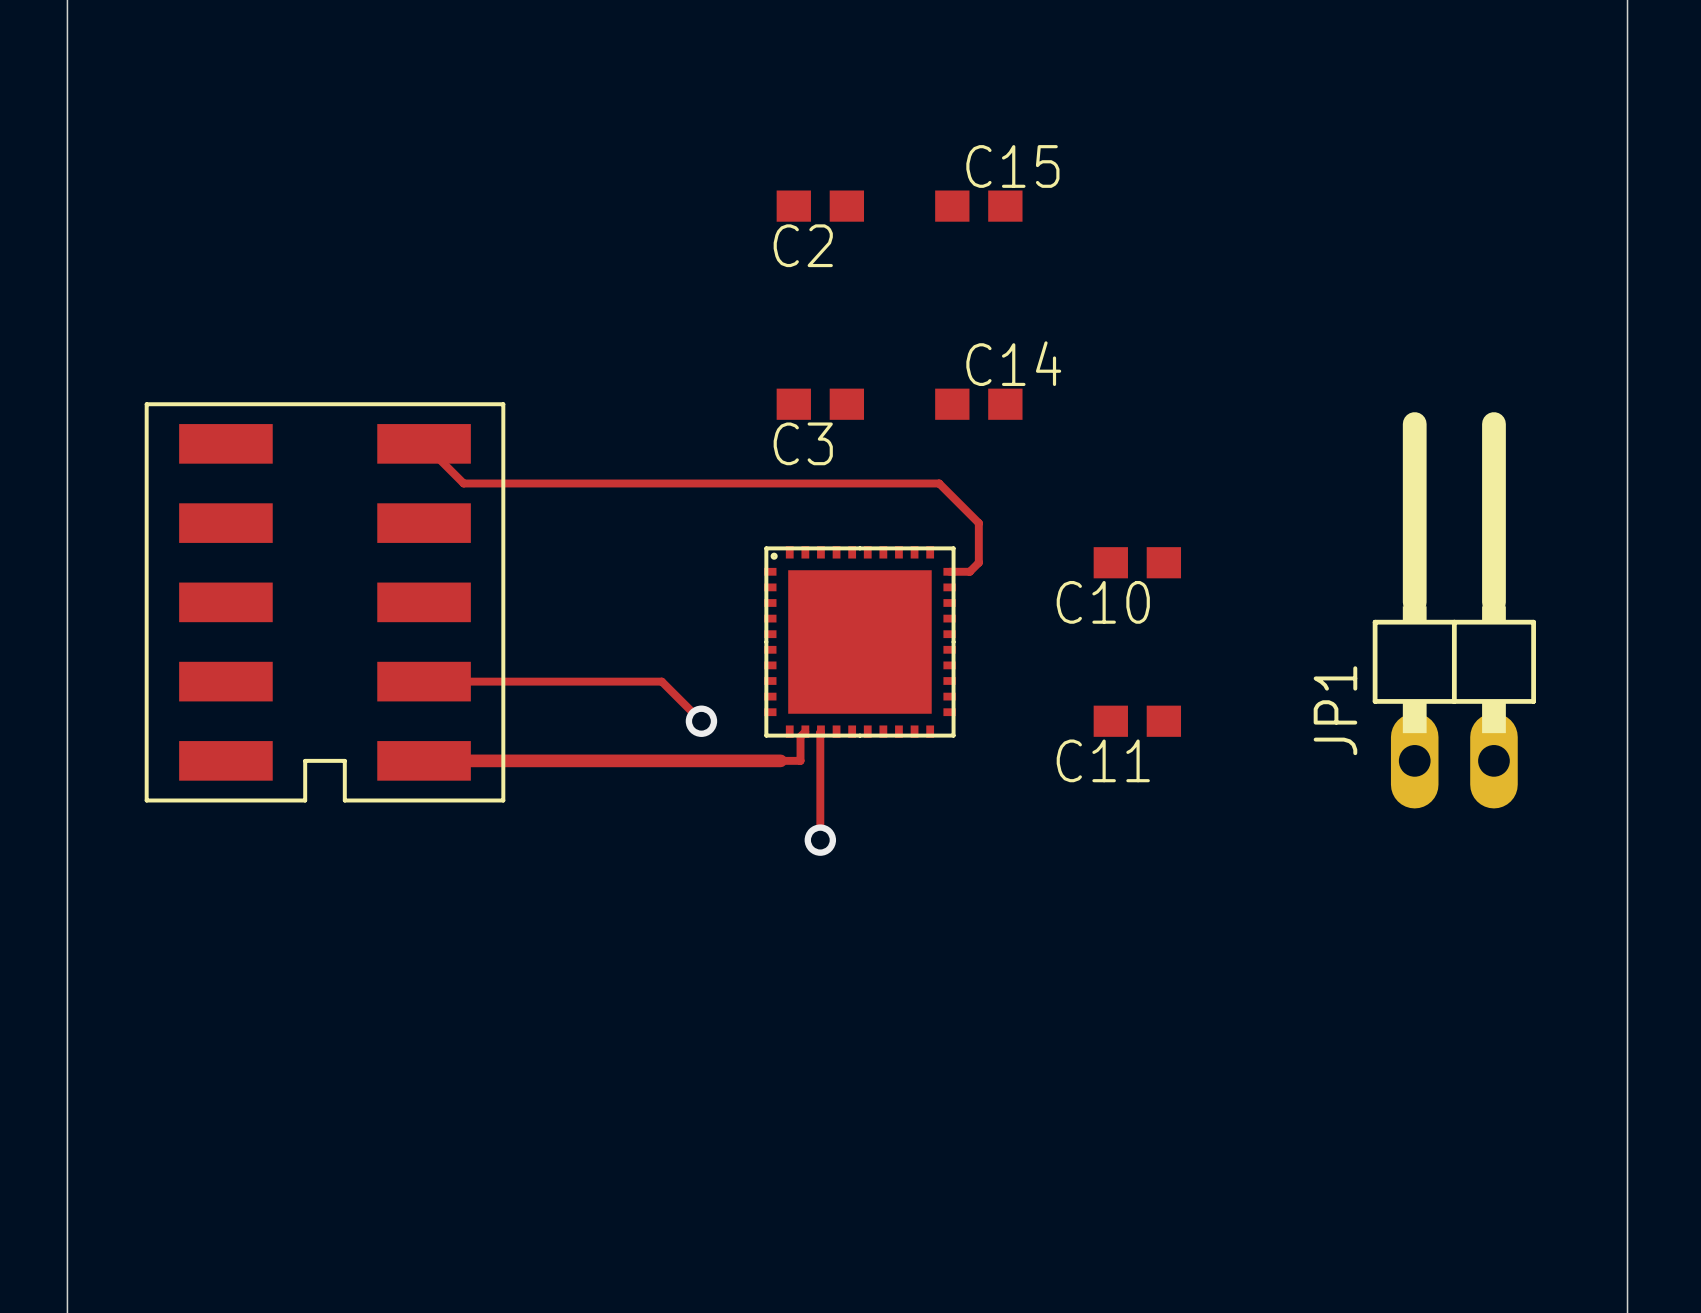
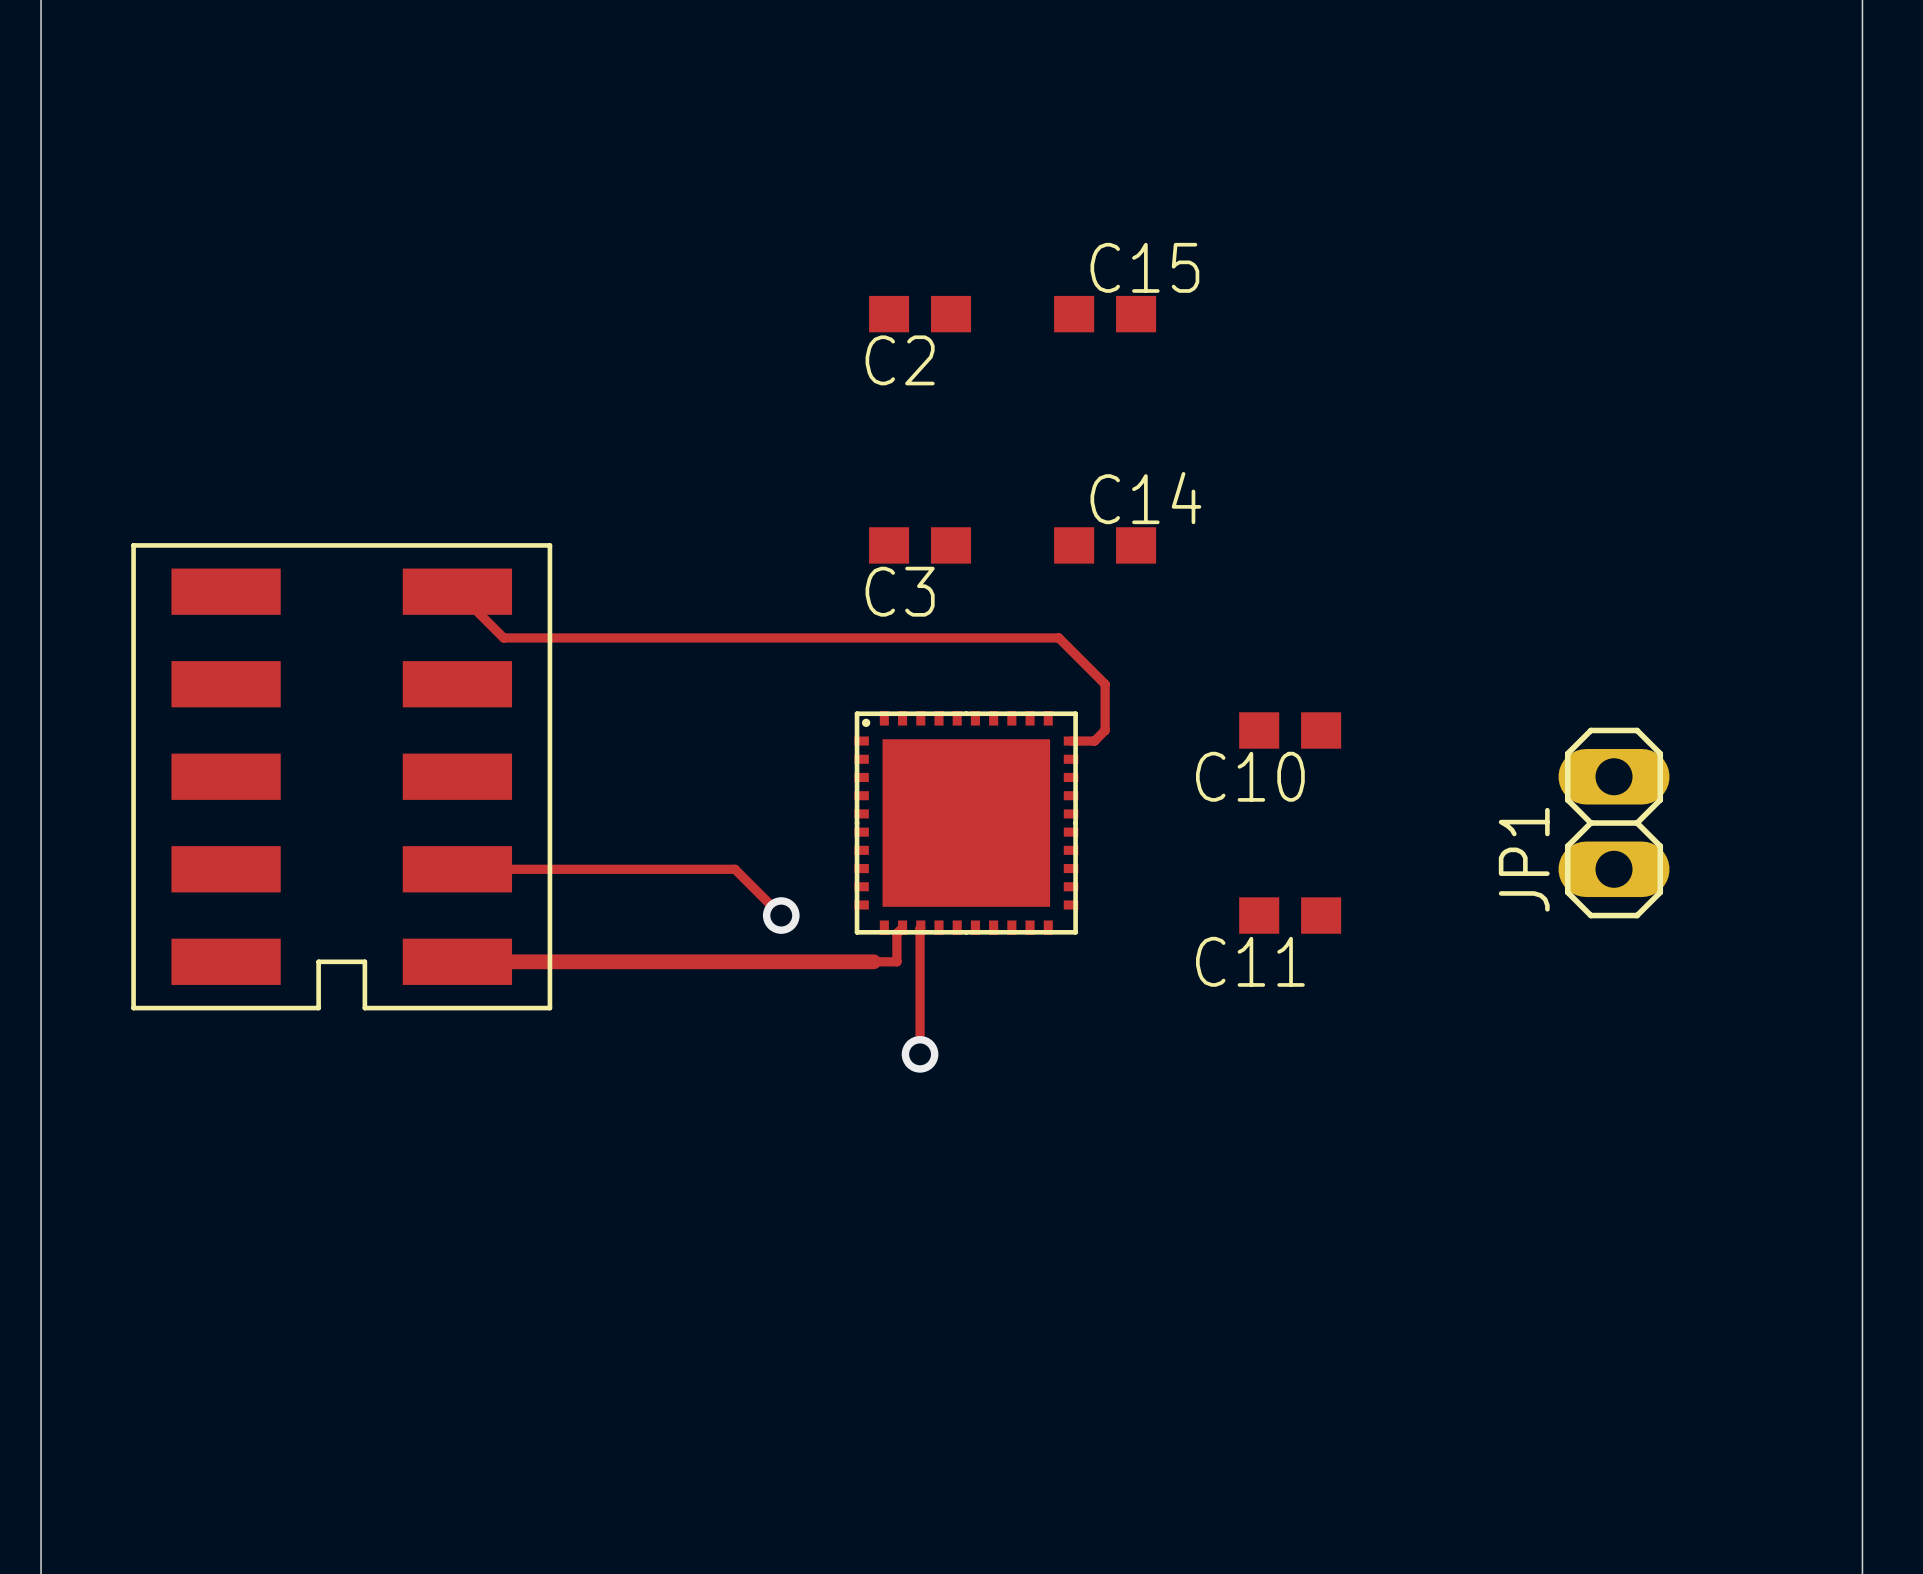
JP1 footprint: [1372, 412, 1536, 809] -> [1558, 727, 1670, 919]
JP1 name position: JP1 (1335, 710) -> JP1 (1524, 859)

